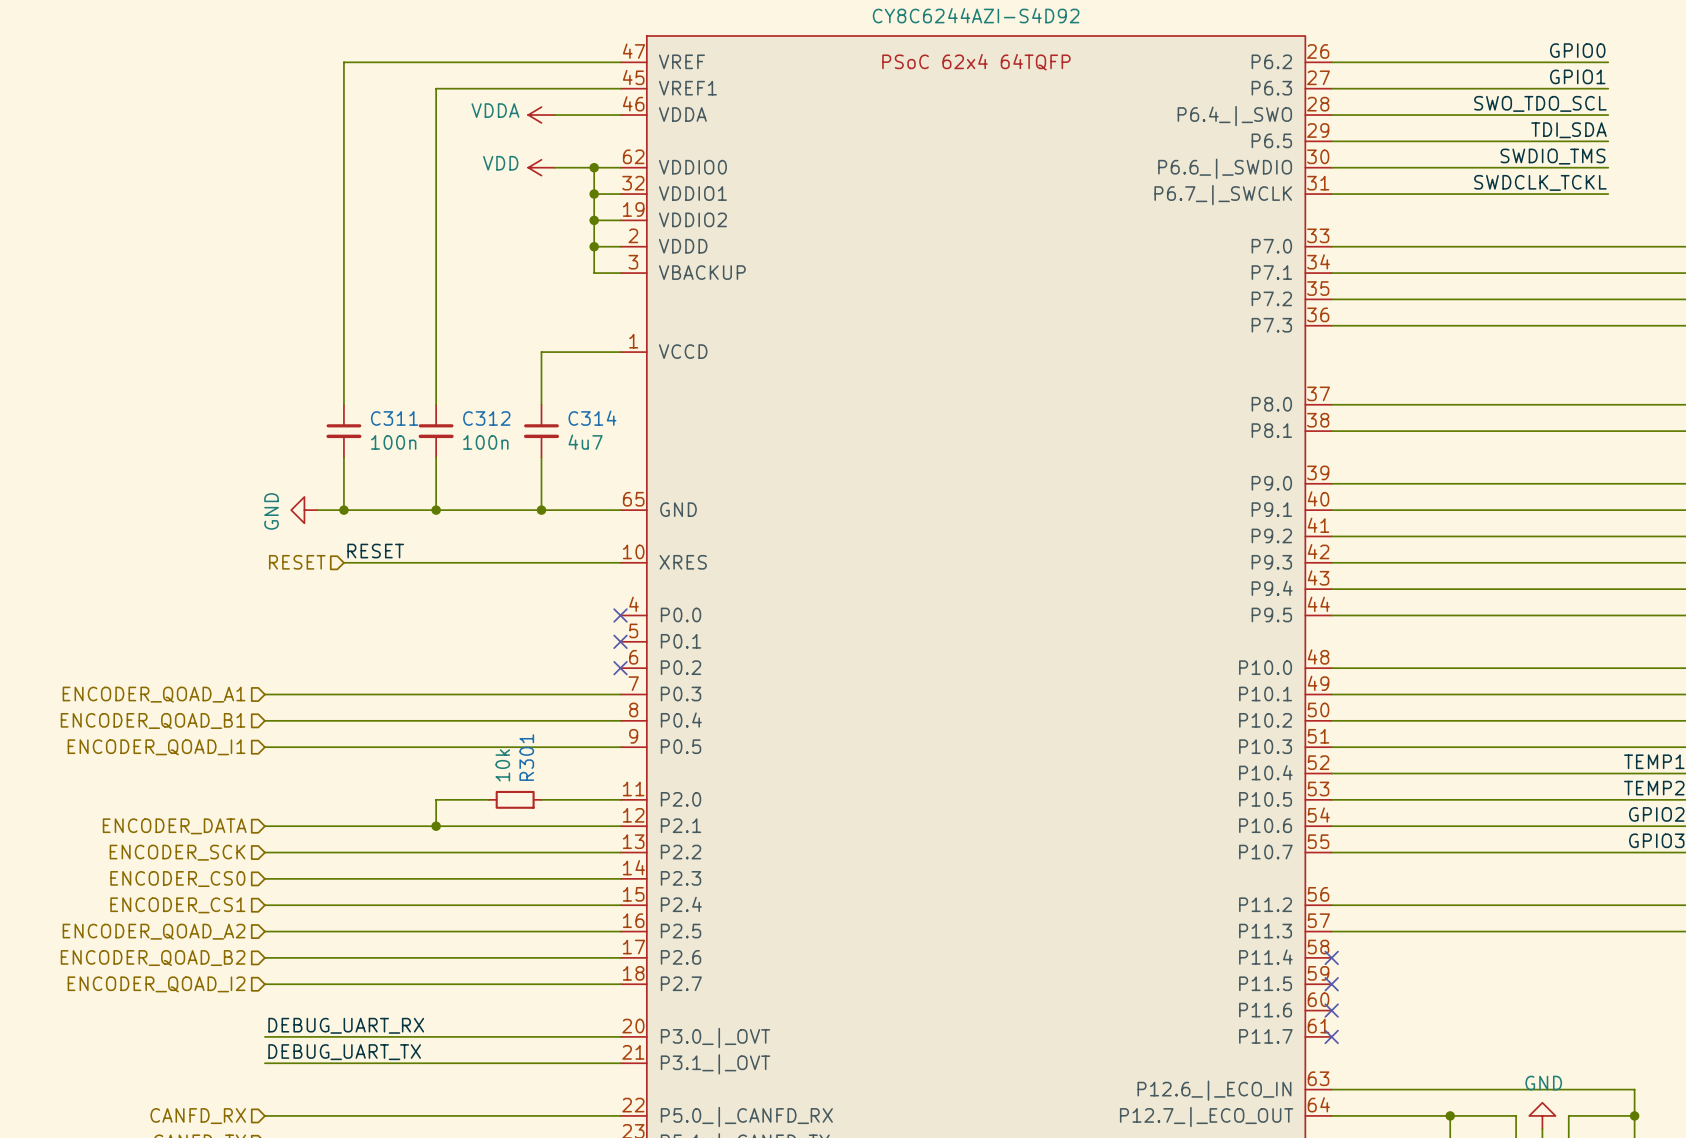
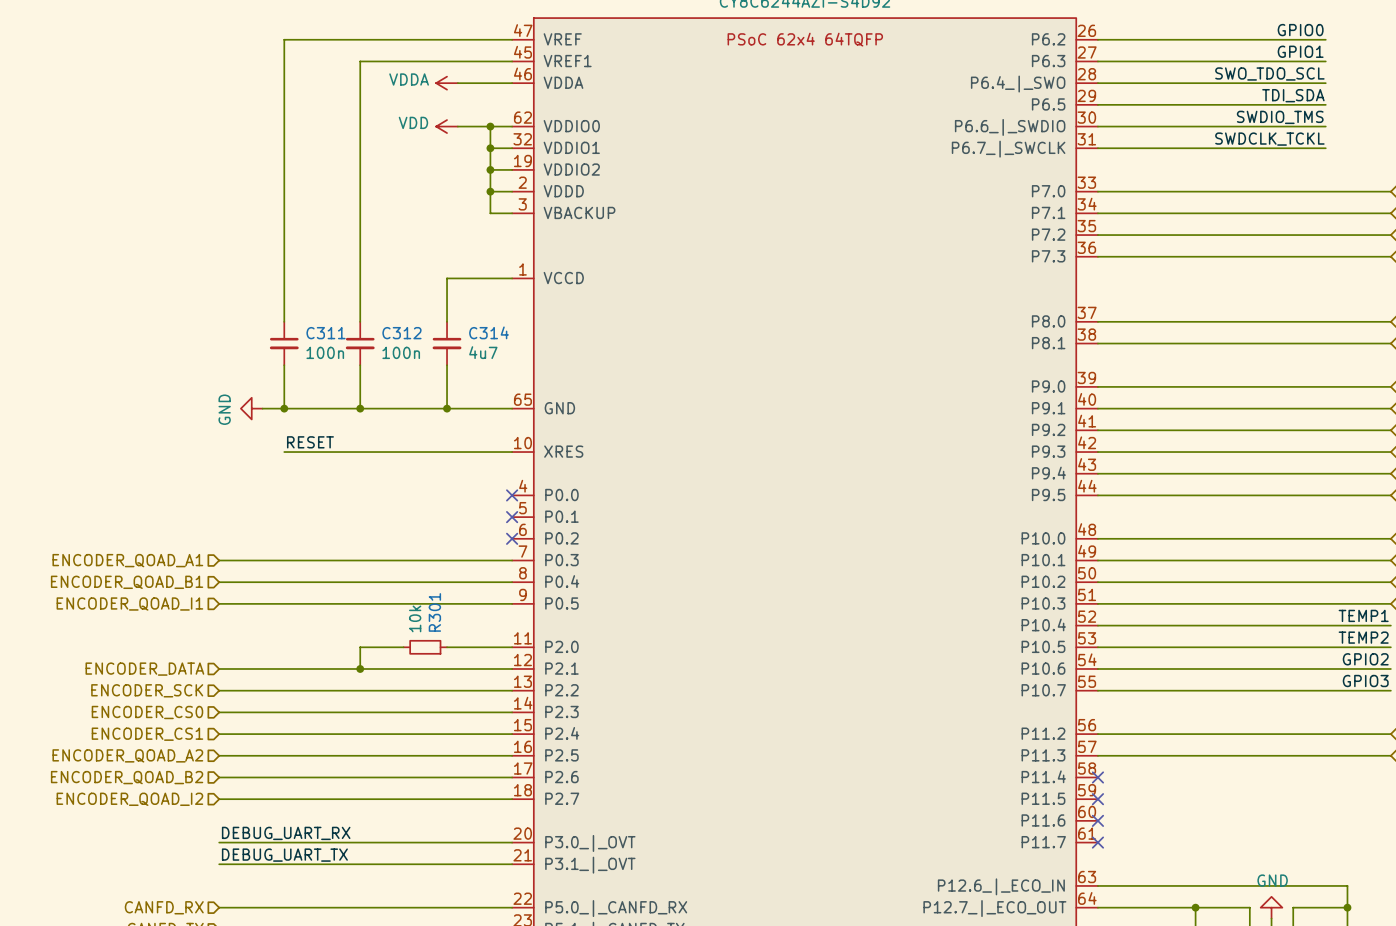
hierarchical label: RESET (297, 562) -> none

